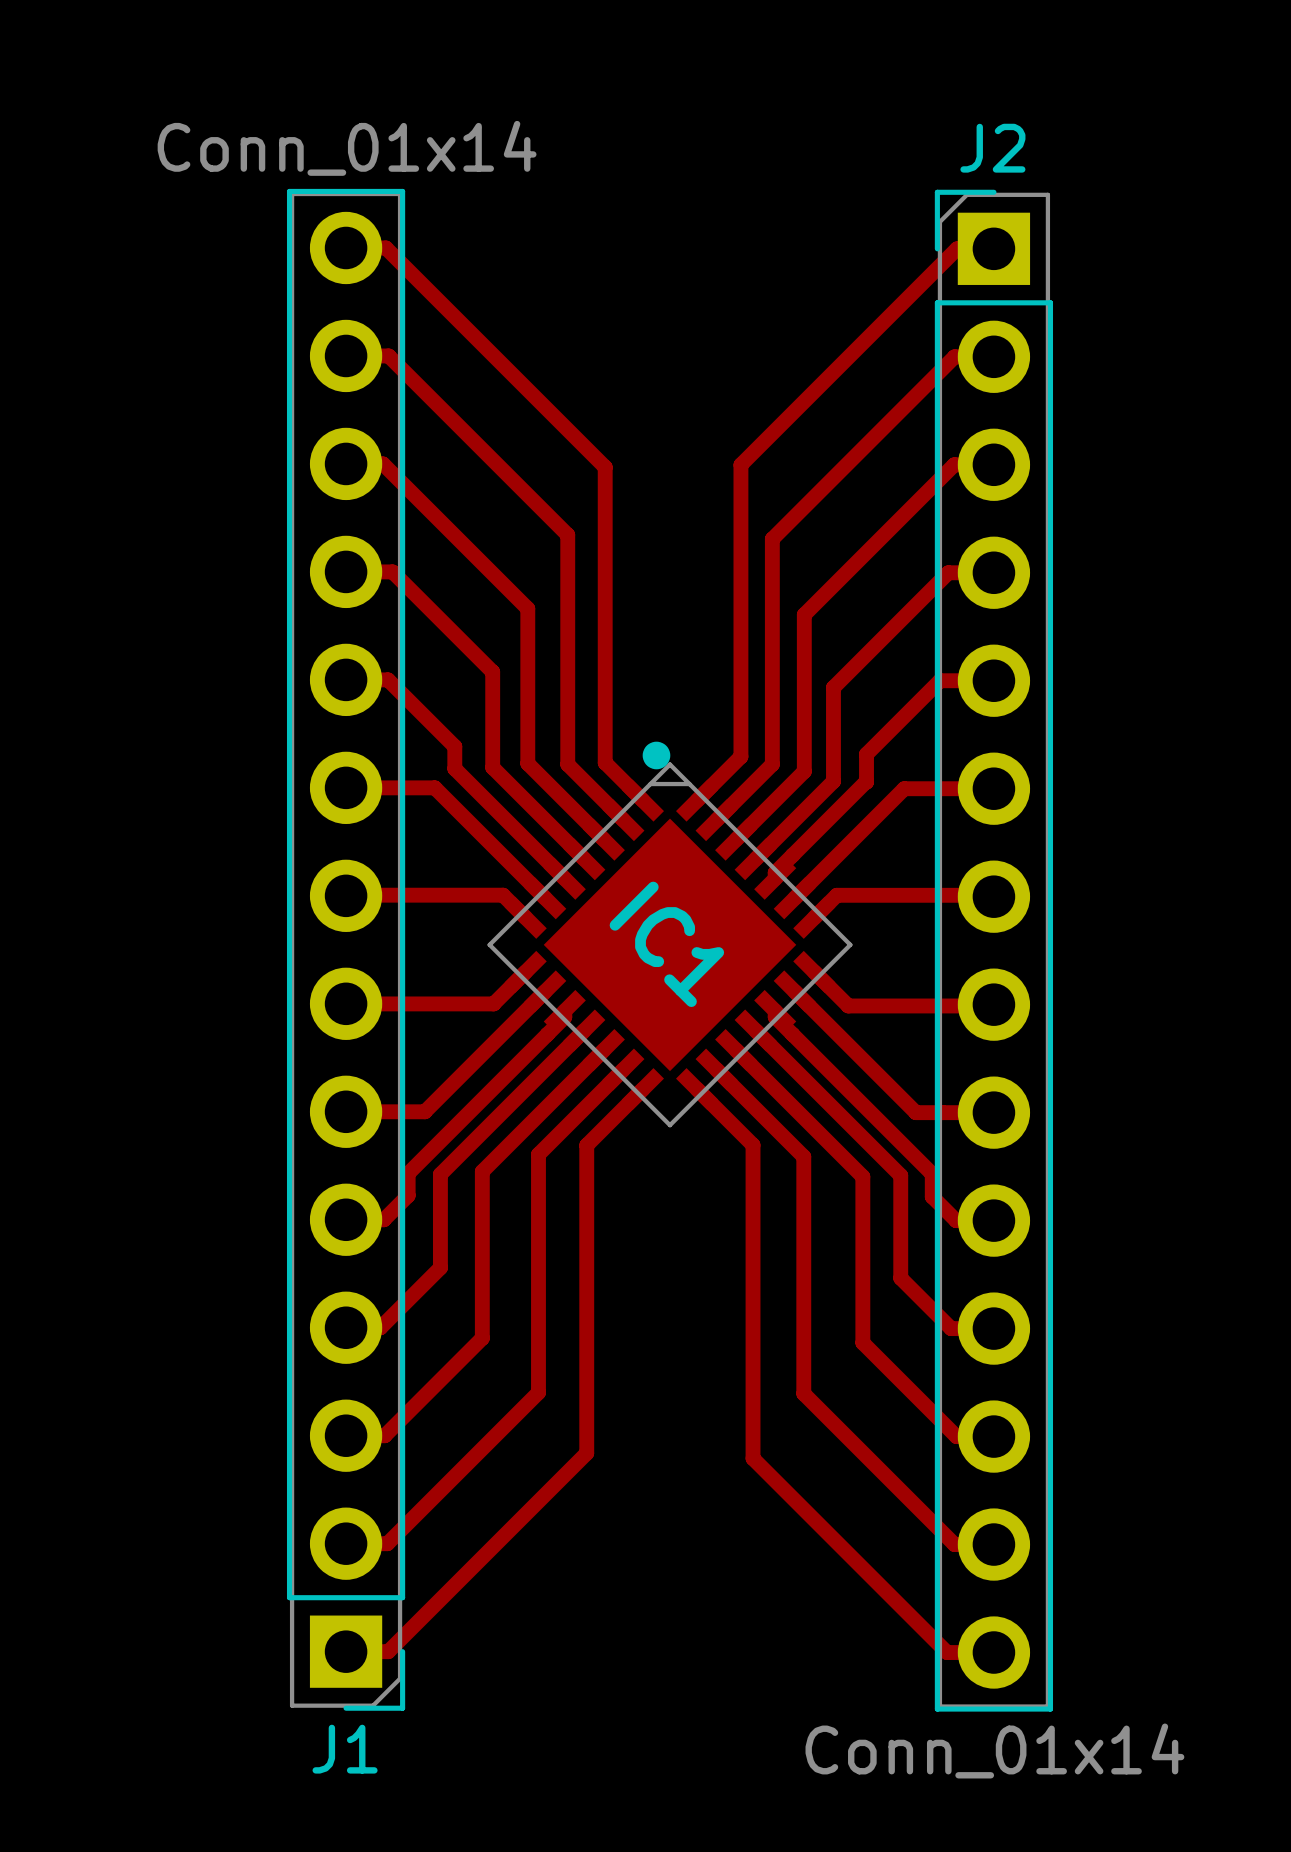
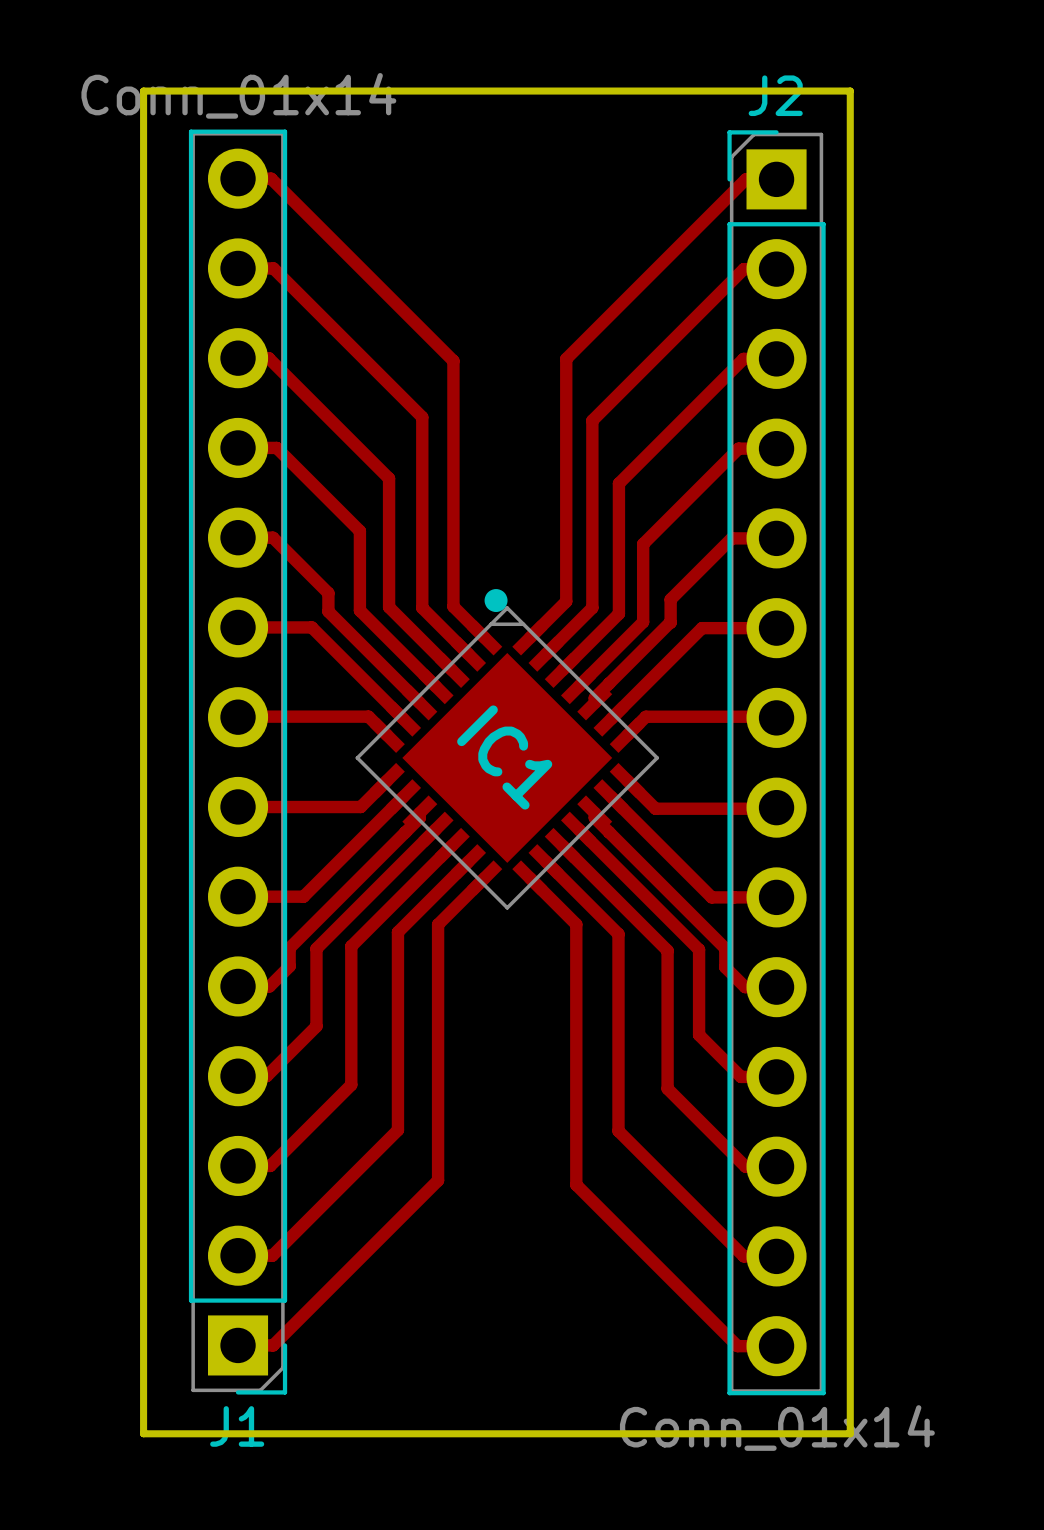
board edge: none -> (143, 91) (143, 1433) (850, 1433) (850, 91) (143, 91)

